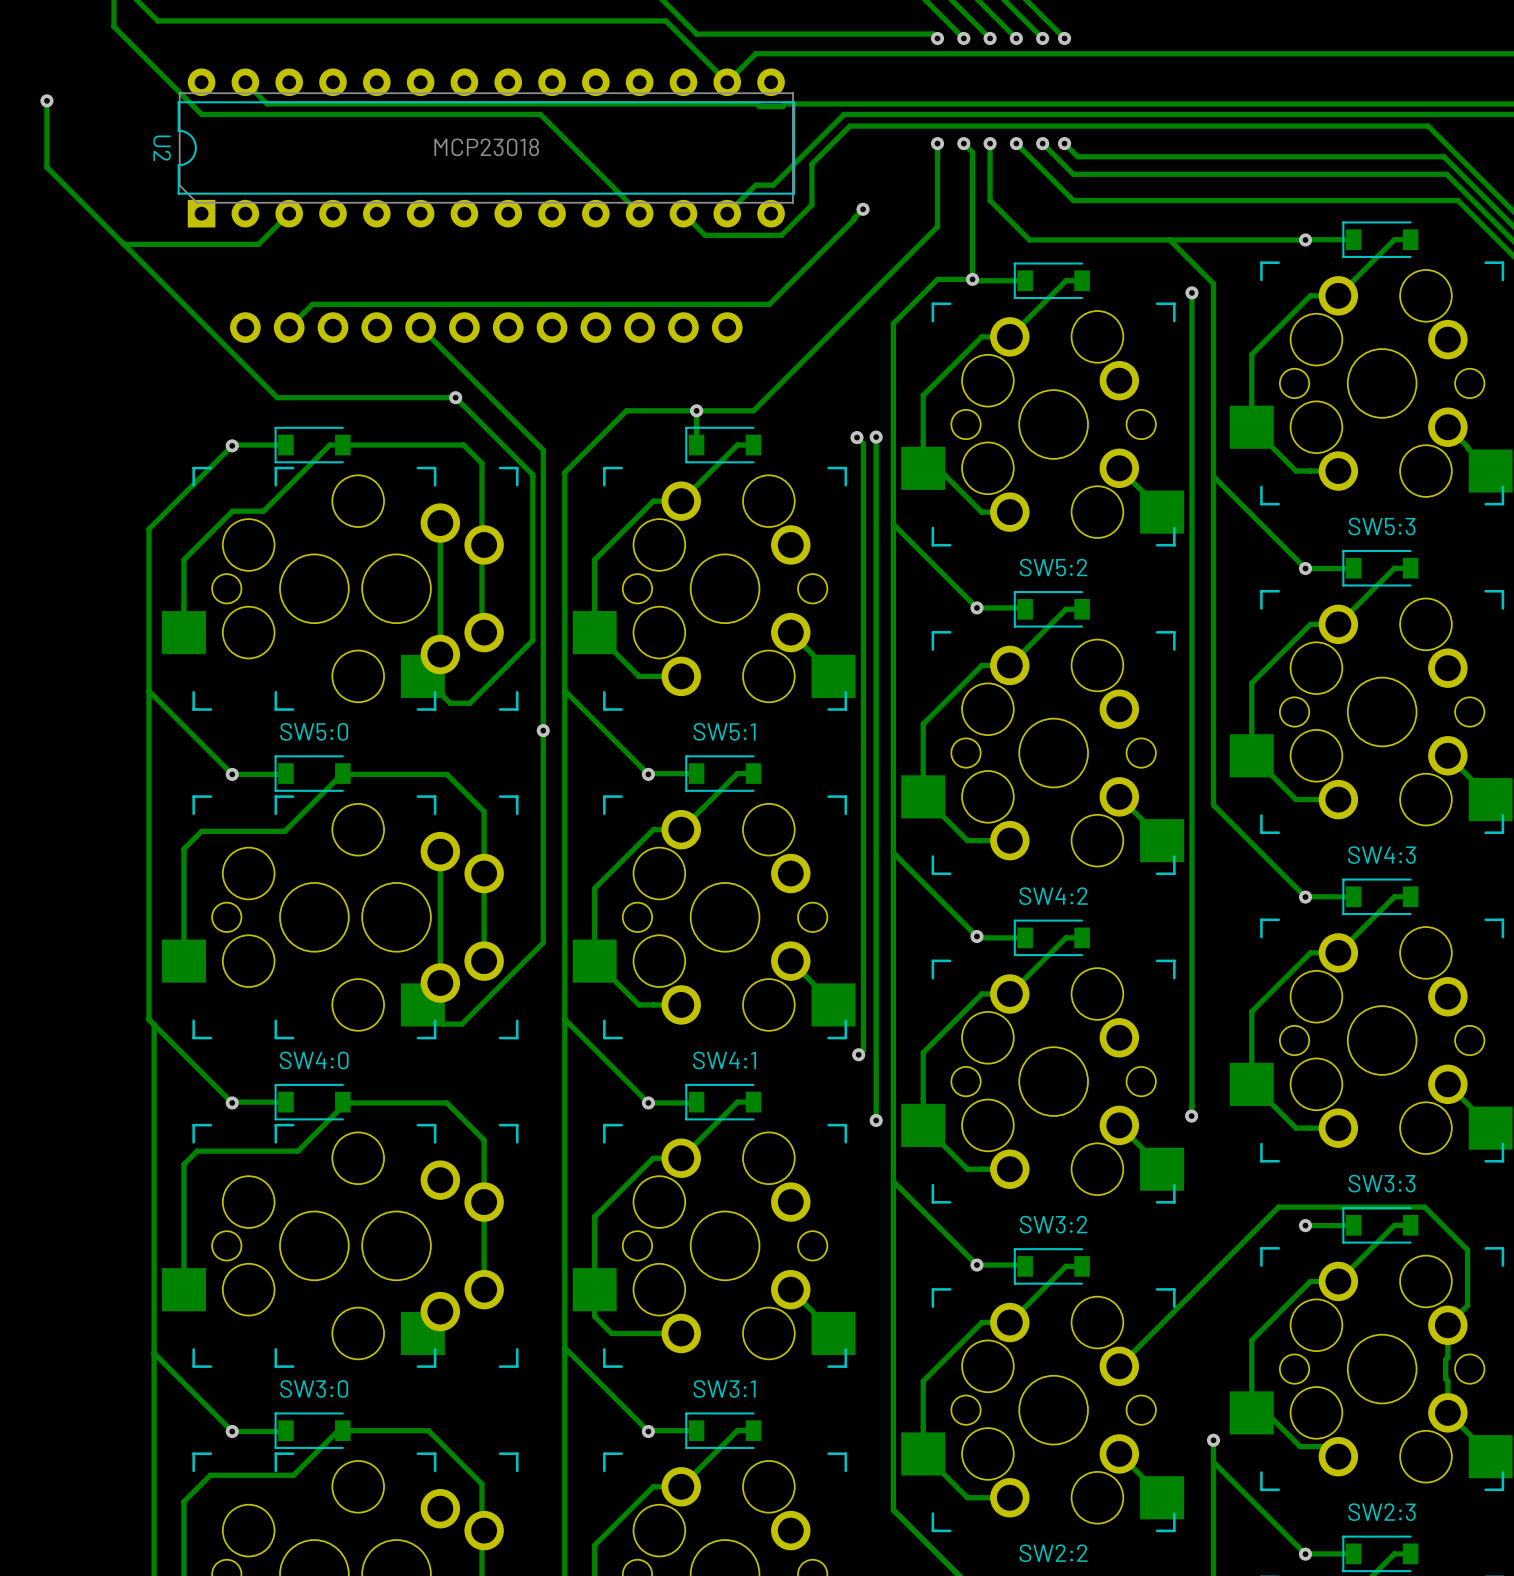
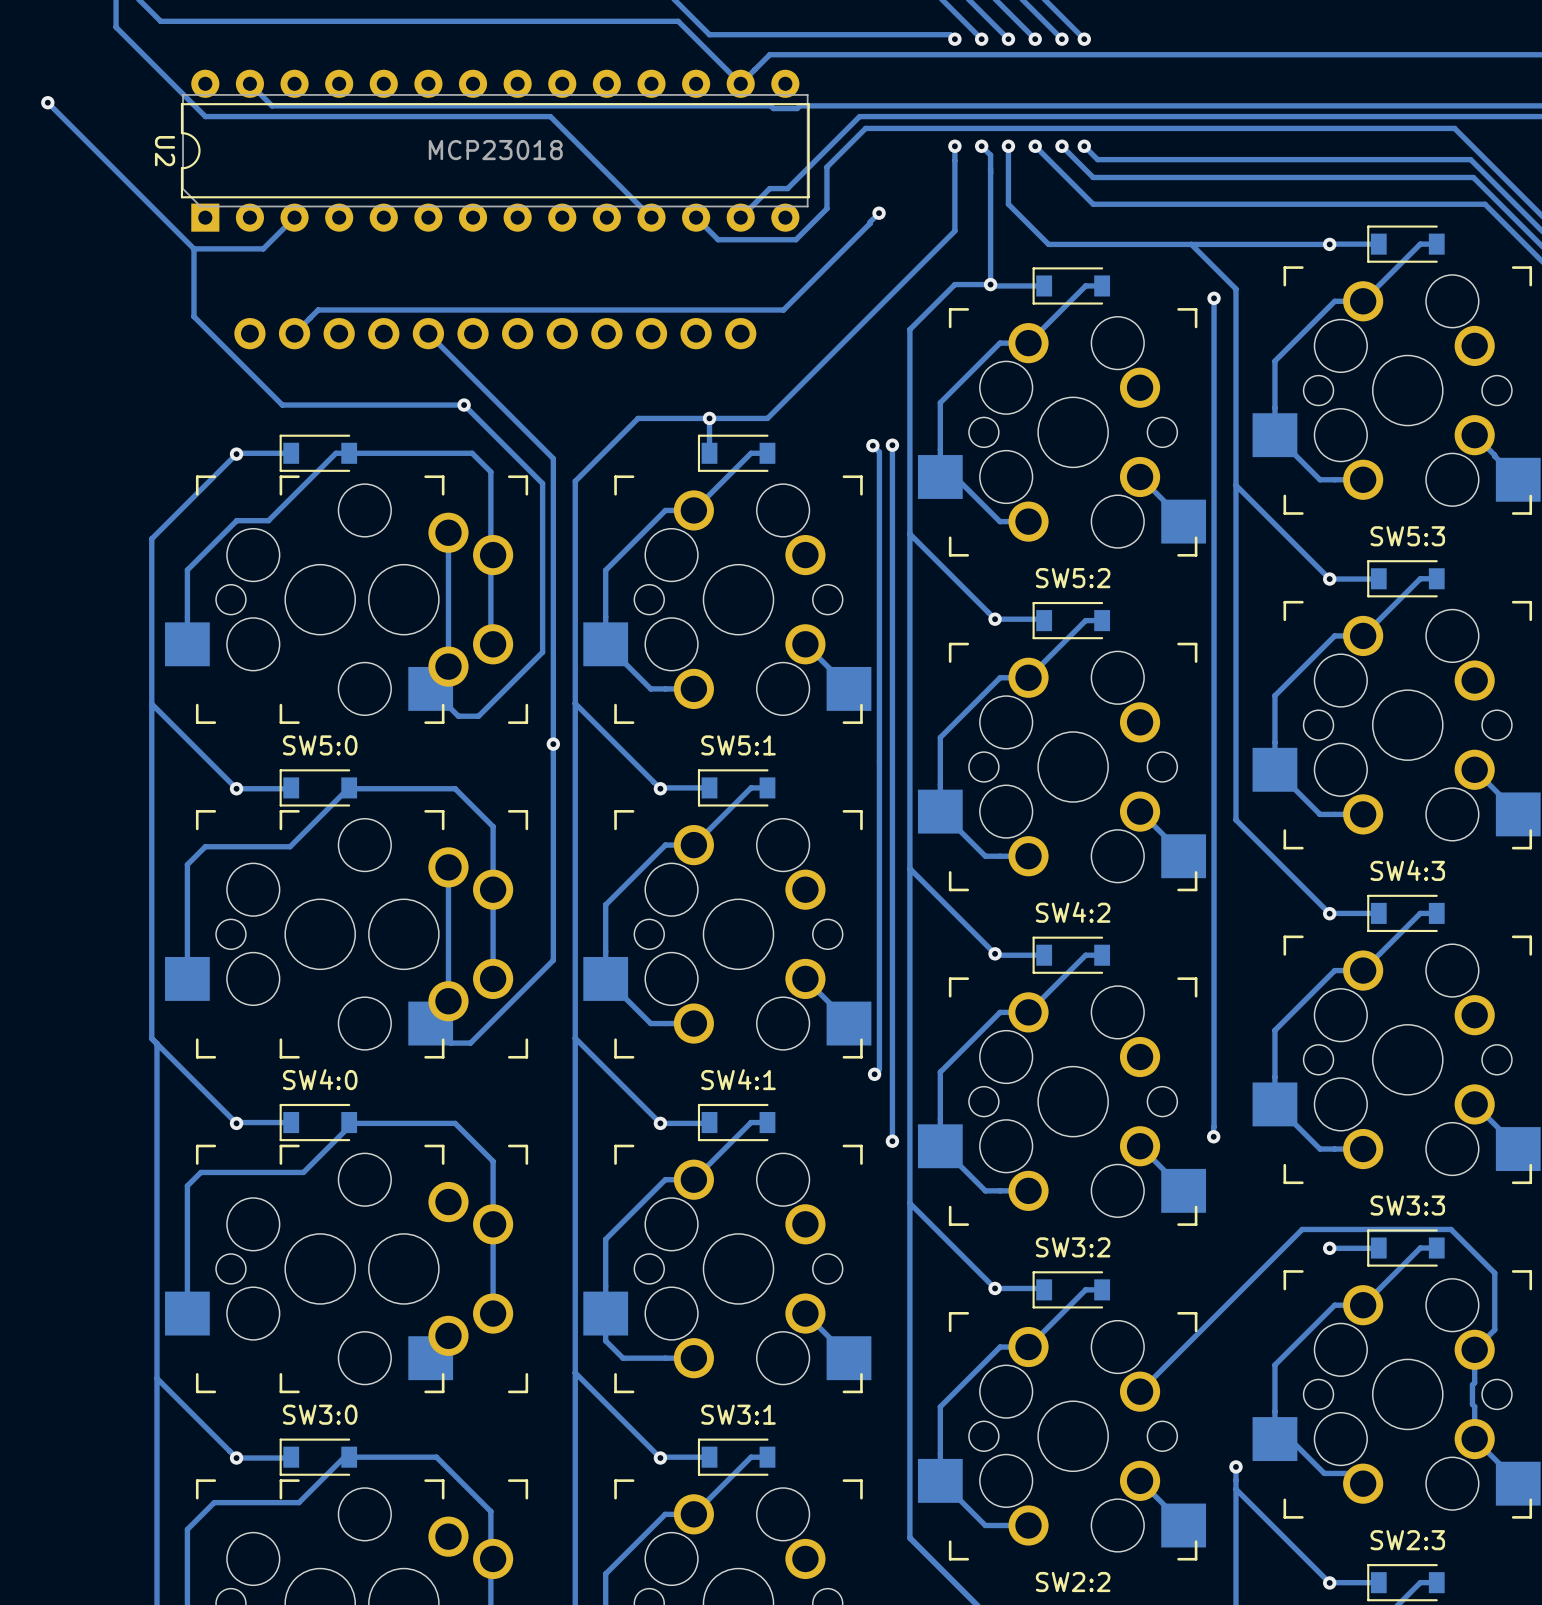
track: (46, 100) (46, 167) (190, 310) -> (47, 102) (193, 248) (193, 316)
track: (190, 244) (123, 244) -> none

